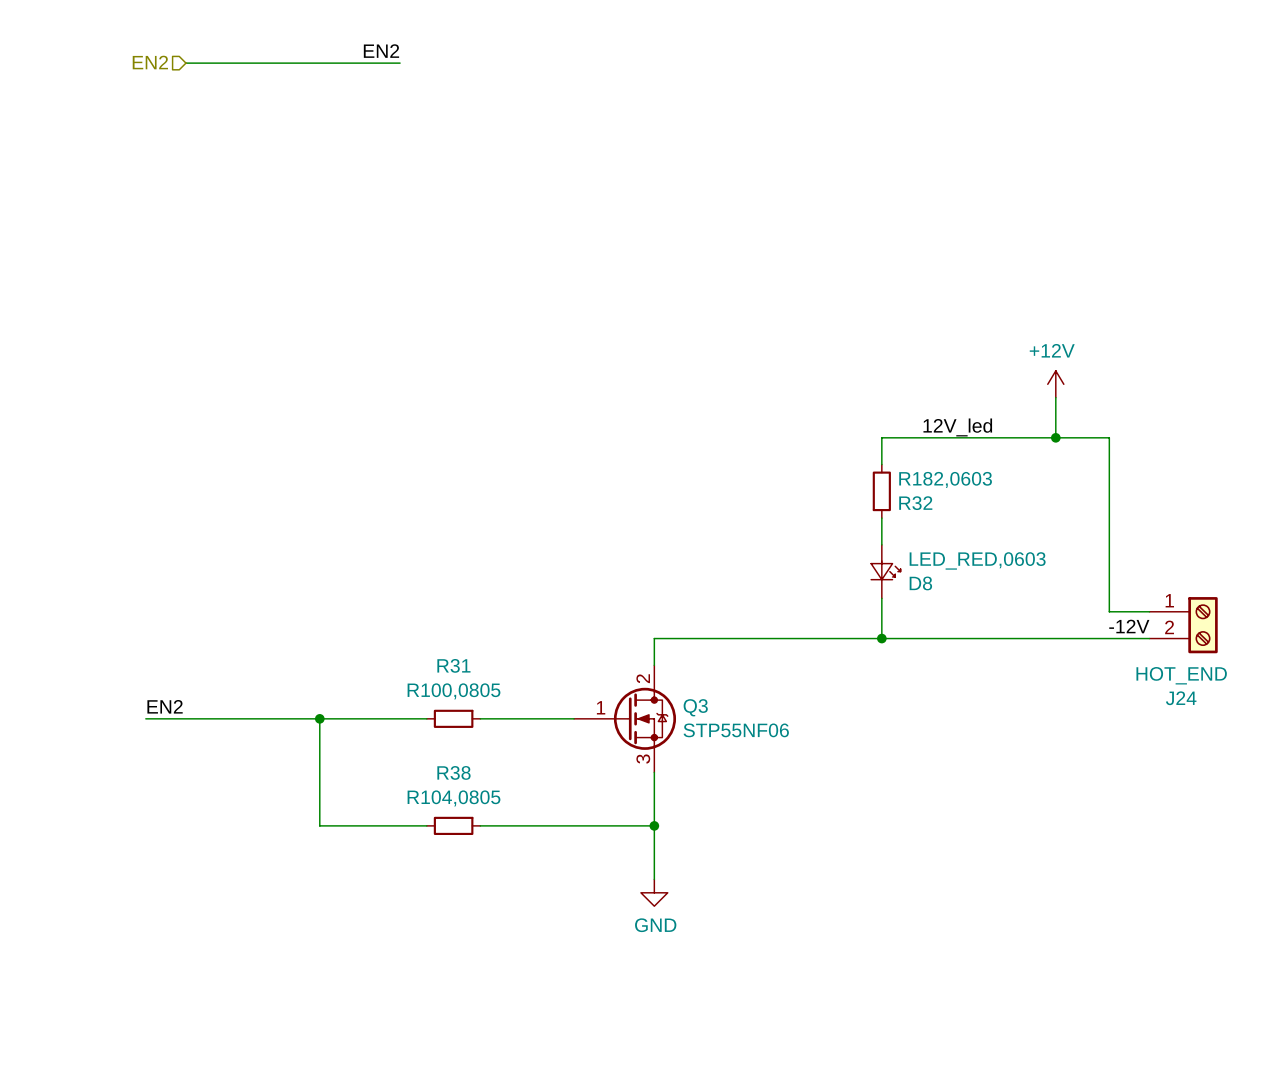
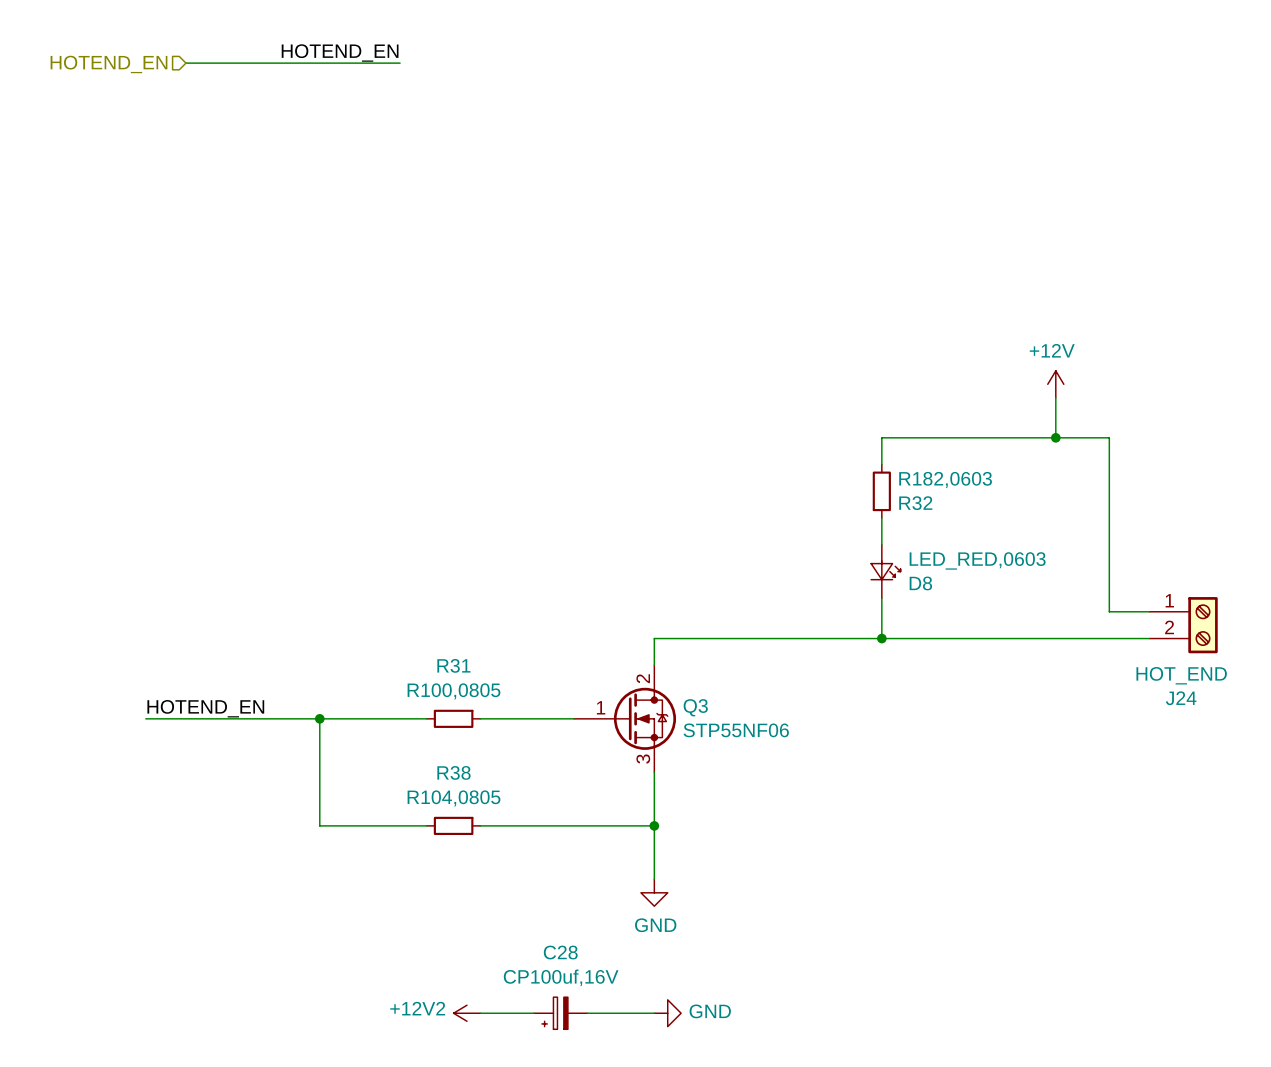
label: EN2 (381, 51) -> HOTEND_EN (340, 53)
hierarchical label: EN2 (150, 62) -> HOTEND_EN (108, 64)
label: 12V_led (957, 427) -> none
label: -12V (1129, 626) -> none
label: EN2 (165, 706) -> HOTEND_EN (205, 708)
power symbol: none -> +12V2 (466, 1013)
wire: none -> (480, 1013) (533, 1013)
C28: none -> CP100uf,16V (560, 1013)
wire: none -> (587, 1013) (654, 1013)
power symbol: none -> GND (667, 1013)

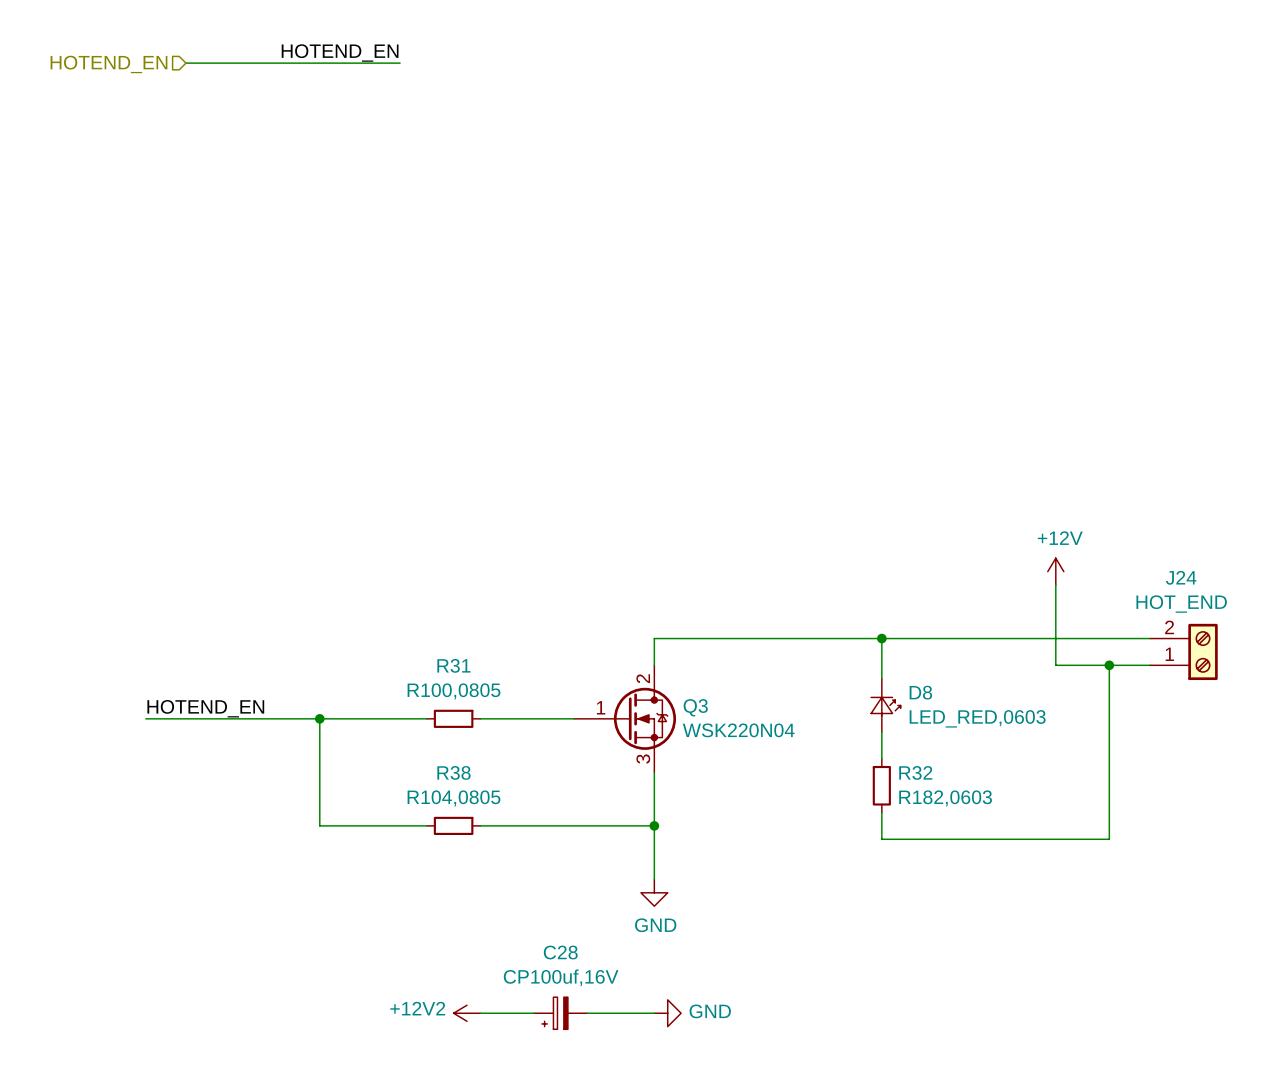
power symbol text position: +12V (1052, 350) -> +12V (1060, 538)
power symbol position: +12V (1055, 384) -> +12V (1055, 571)
wire: (1055, 397) (1055, 437) -> none
junction: (1055, 437) -> none
wire: (881, 464) (881, 437) (1109, 437) (1109, 611) (1149, 611) -> none
R32 value position: R182,0603 (945, 479) -> R182,0603 (945, 798)
R32 position: (881, 491) -> (881, 785)
R32 name position: R32 (915, 503) -> R32 (915, 772)
wire: (881, 518) (881, 544) -> (881, 732) (881, 758)
D8 flip: as is (885, 570) -> up-down (885, 706)
D8 position: (885, 571) -> (885, 705)
wire: none -> (1055, 585) (1055, 665) (1149, 665)
wire: (881, 598) (881, 638) -> (881, 678) (881, 638)
J24 flip: as is (1203, 625) -> up-down (1203, 651)
wire: none -> (1109, 665) (1109, 839) (881, 839) (881, 812)
junction: none -> (1109, 665)
Q3 value: STP55NF06 (736, 730) -> WSK220N04 (738, 730)

